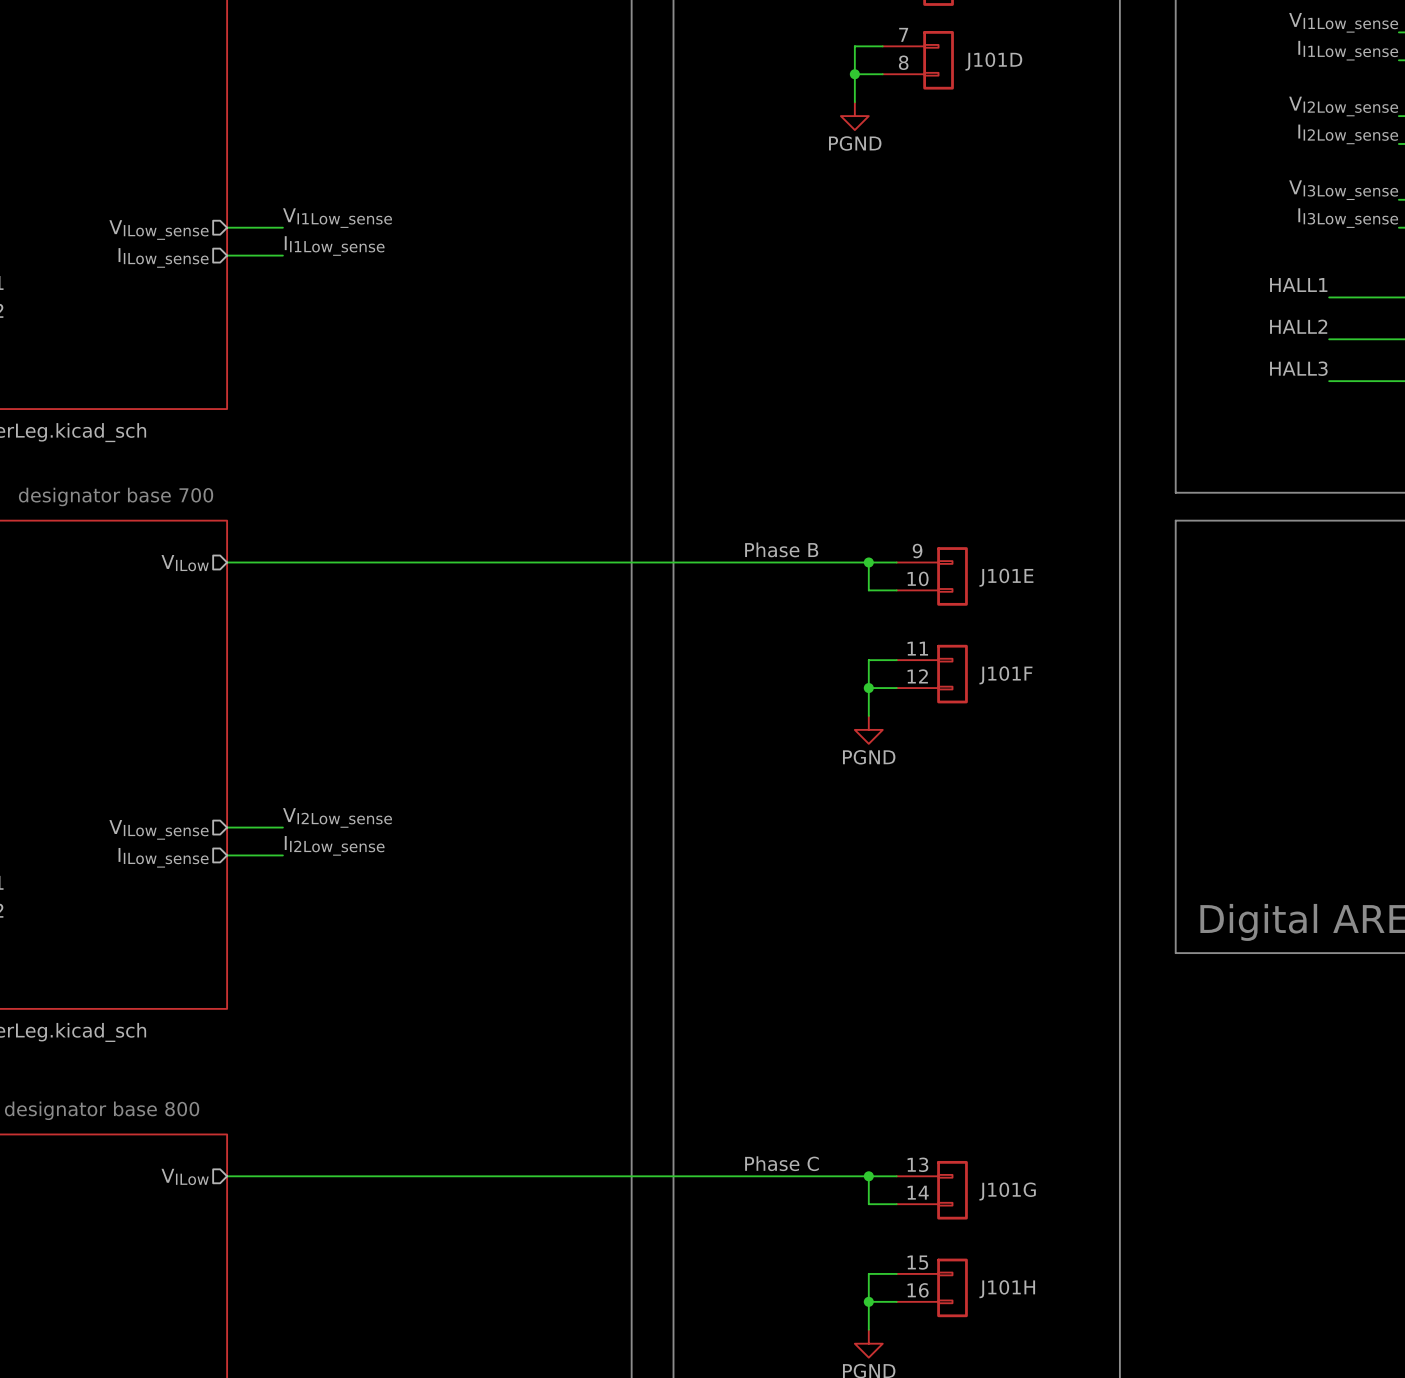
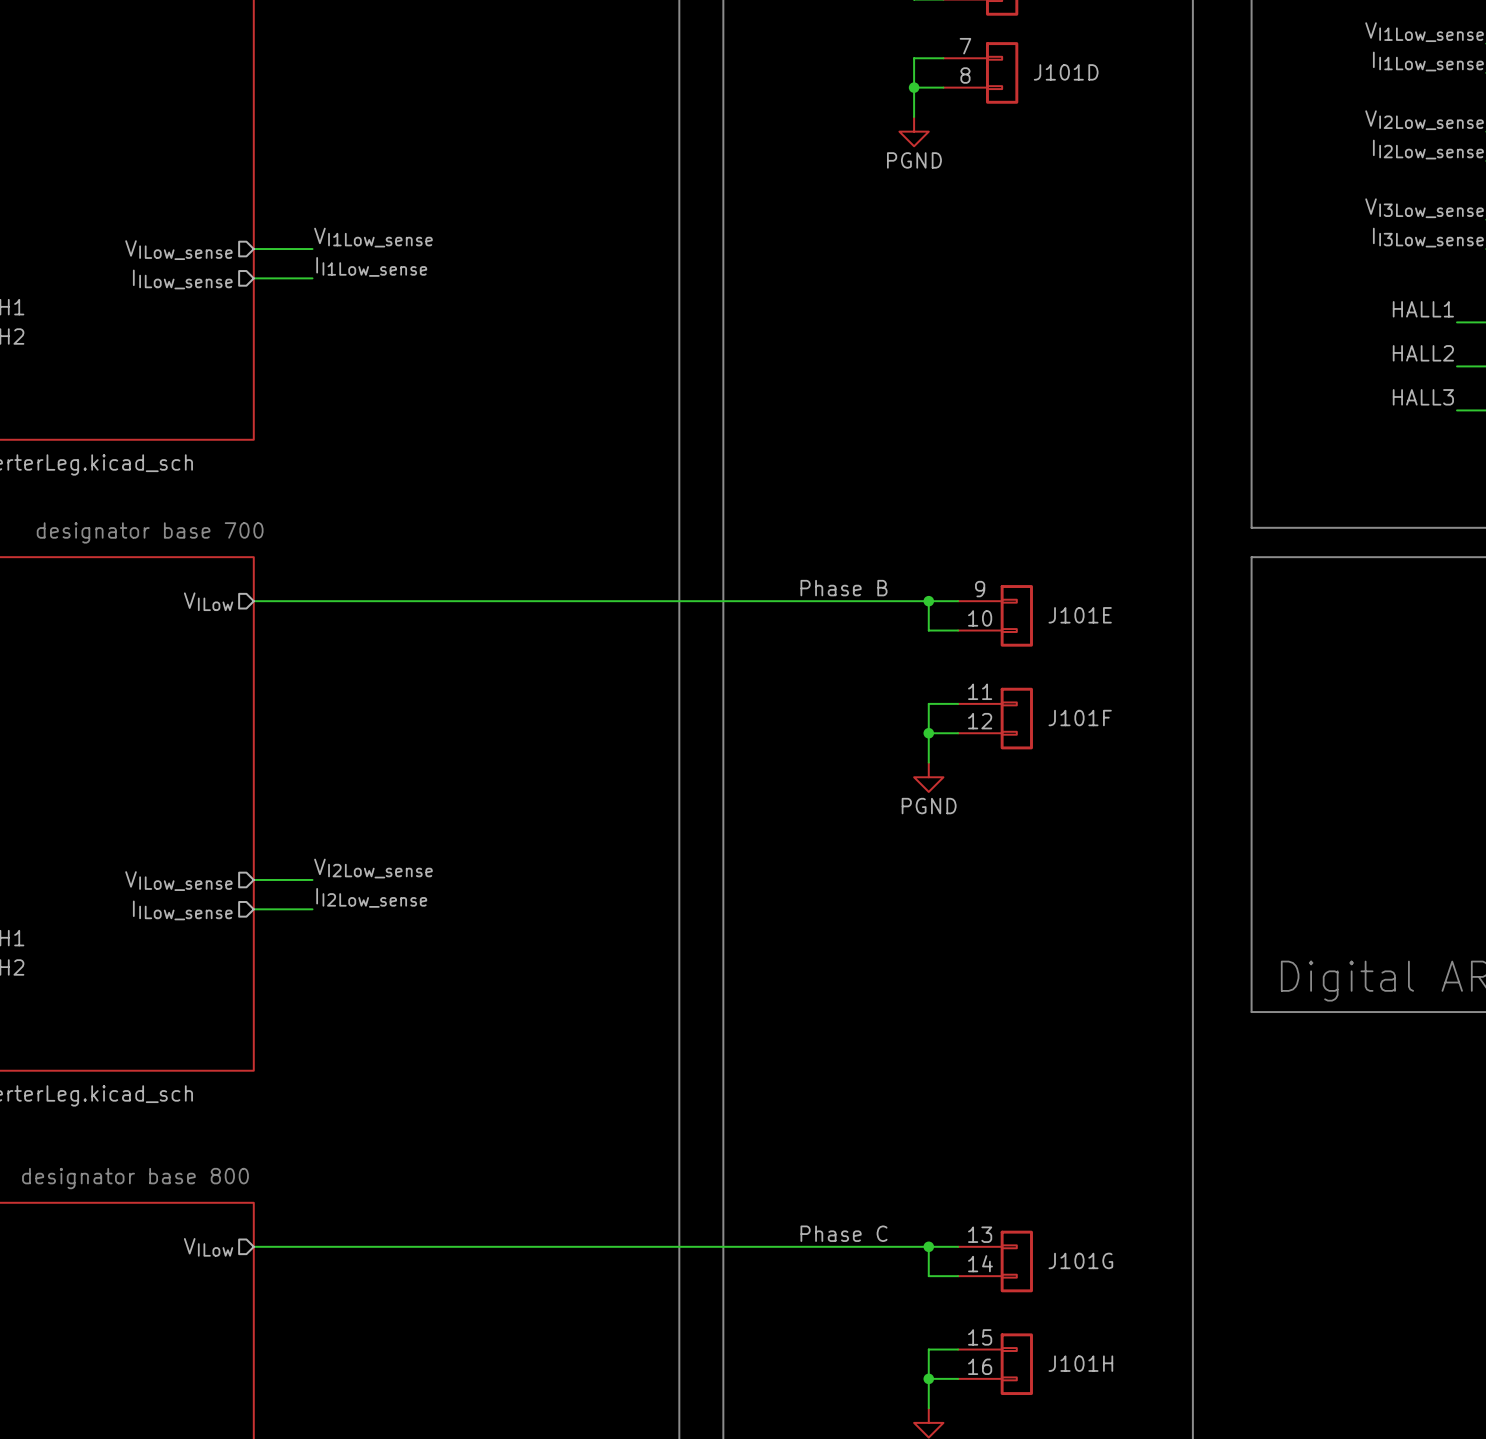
label position: HALL1 (1298, 284) -> HALL1 (1423, 309)
wire: (1329, 297) (1371, 297) -> none
label position: HALL2 (1298, 326) -> HALL2 (1423, 353)
wire: (1329, 339) (1371, 339) -> none
label position: HALL3 (1298, 368) -> HALL3 (1423, 397)
wire: (1329, 381) (1371, 381) -> none

